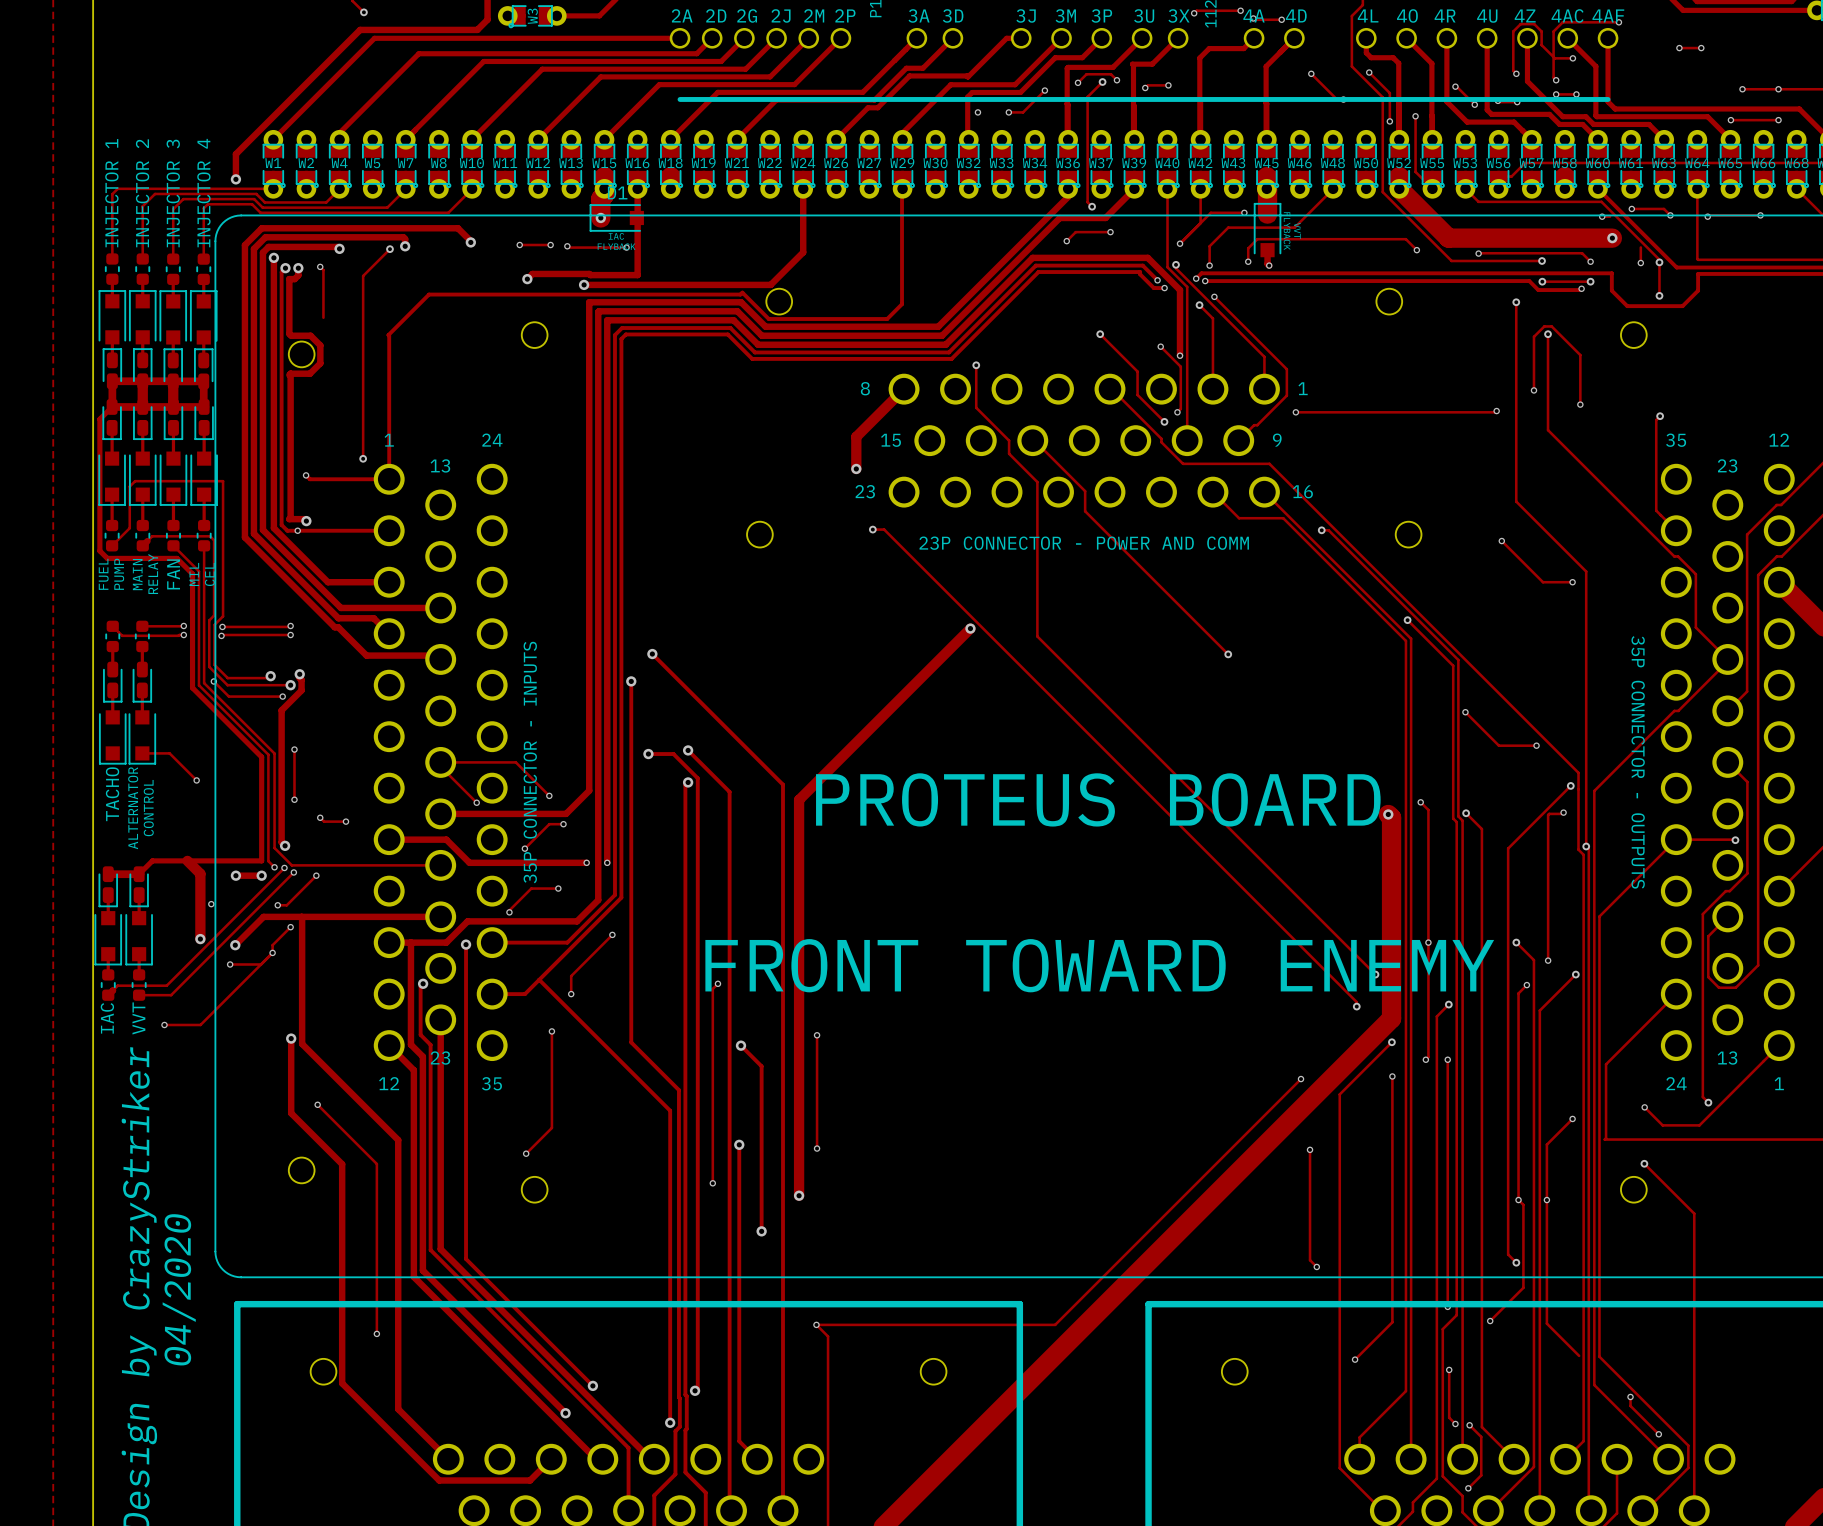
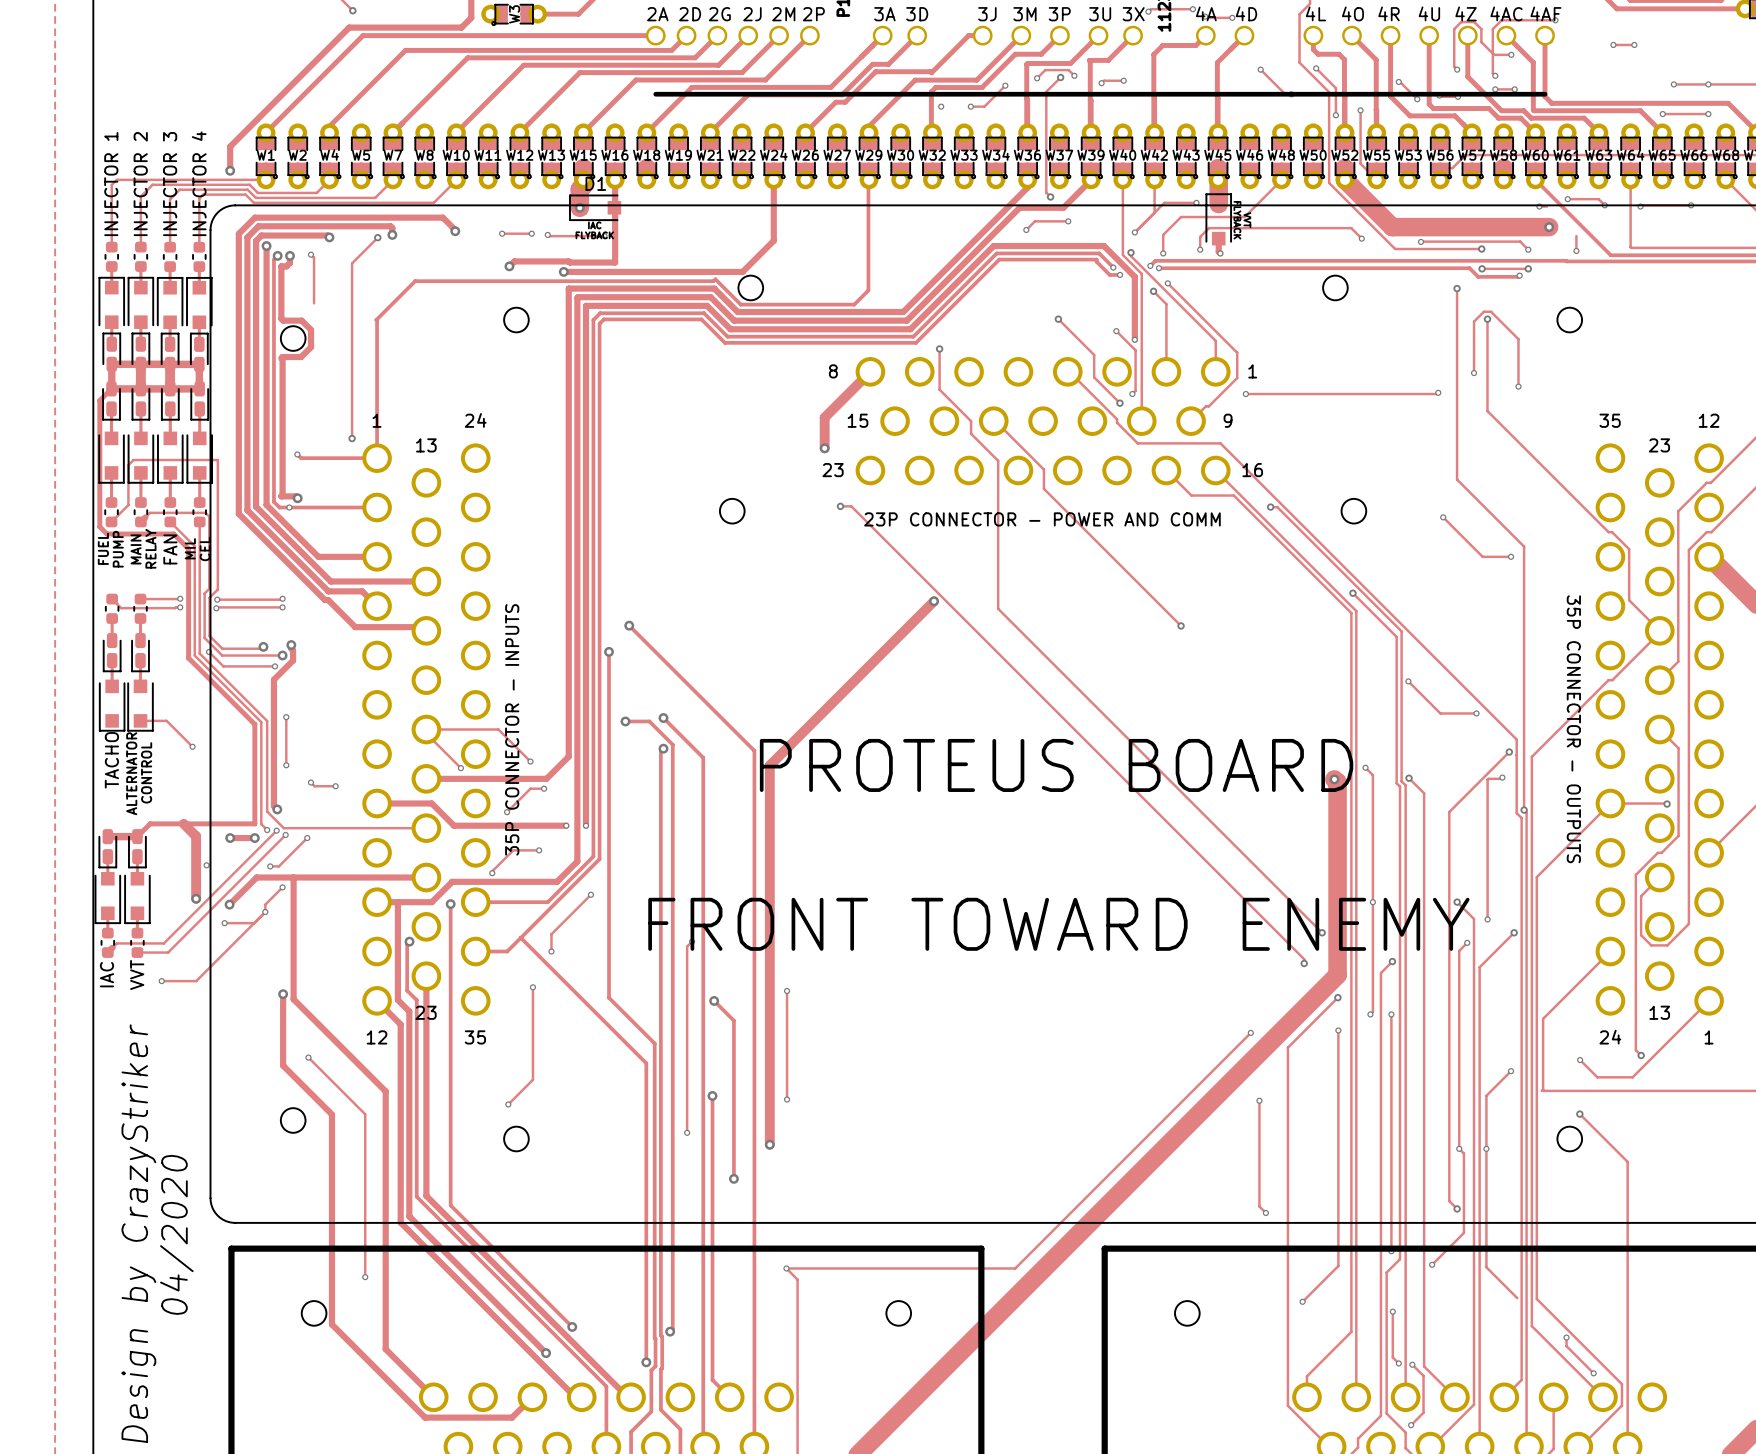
track: (1465, 188) (1478, 201) (1601, 201) (1659, 259) (1659, 295) -> none
via: (1659, 262) -> none
track: (1611, 273) (1611, 290) (1627, 306) (1682, 306) (1698, 290) (1698, 273) -> (1548, 260) (1631, 261)
via: (1659, 295) -> none
track: (1660, 416) (1656, 420) (1656, 510) (1676, 530) -> none
via: (1660, 416) -> none

